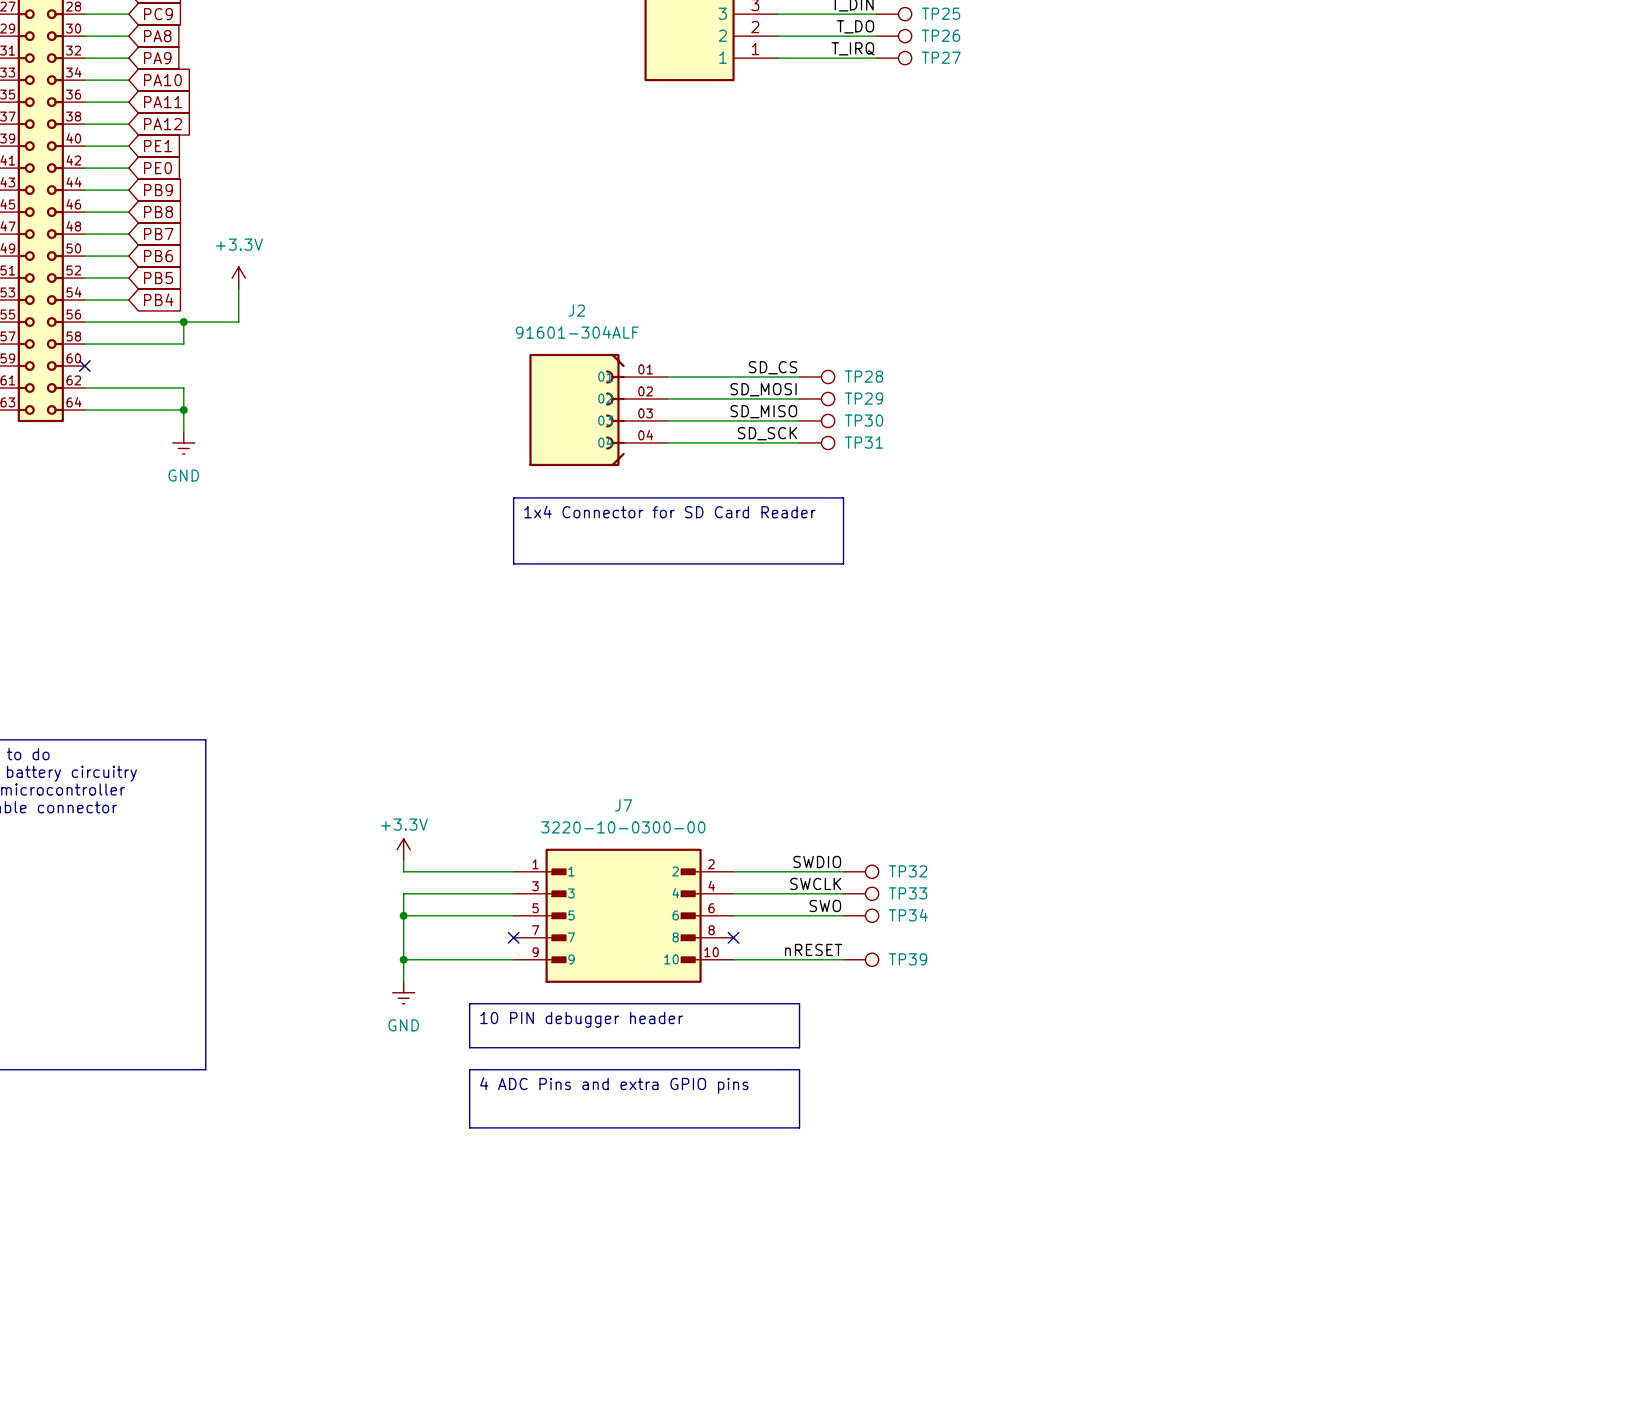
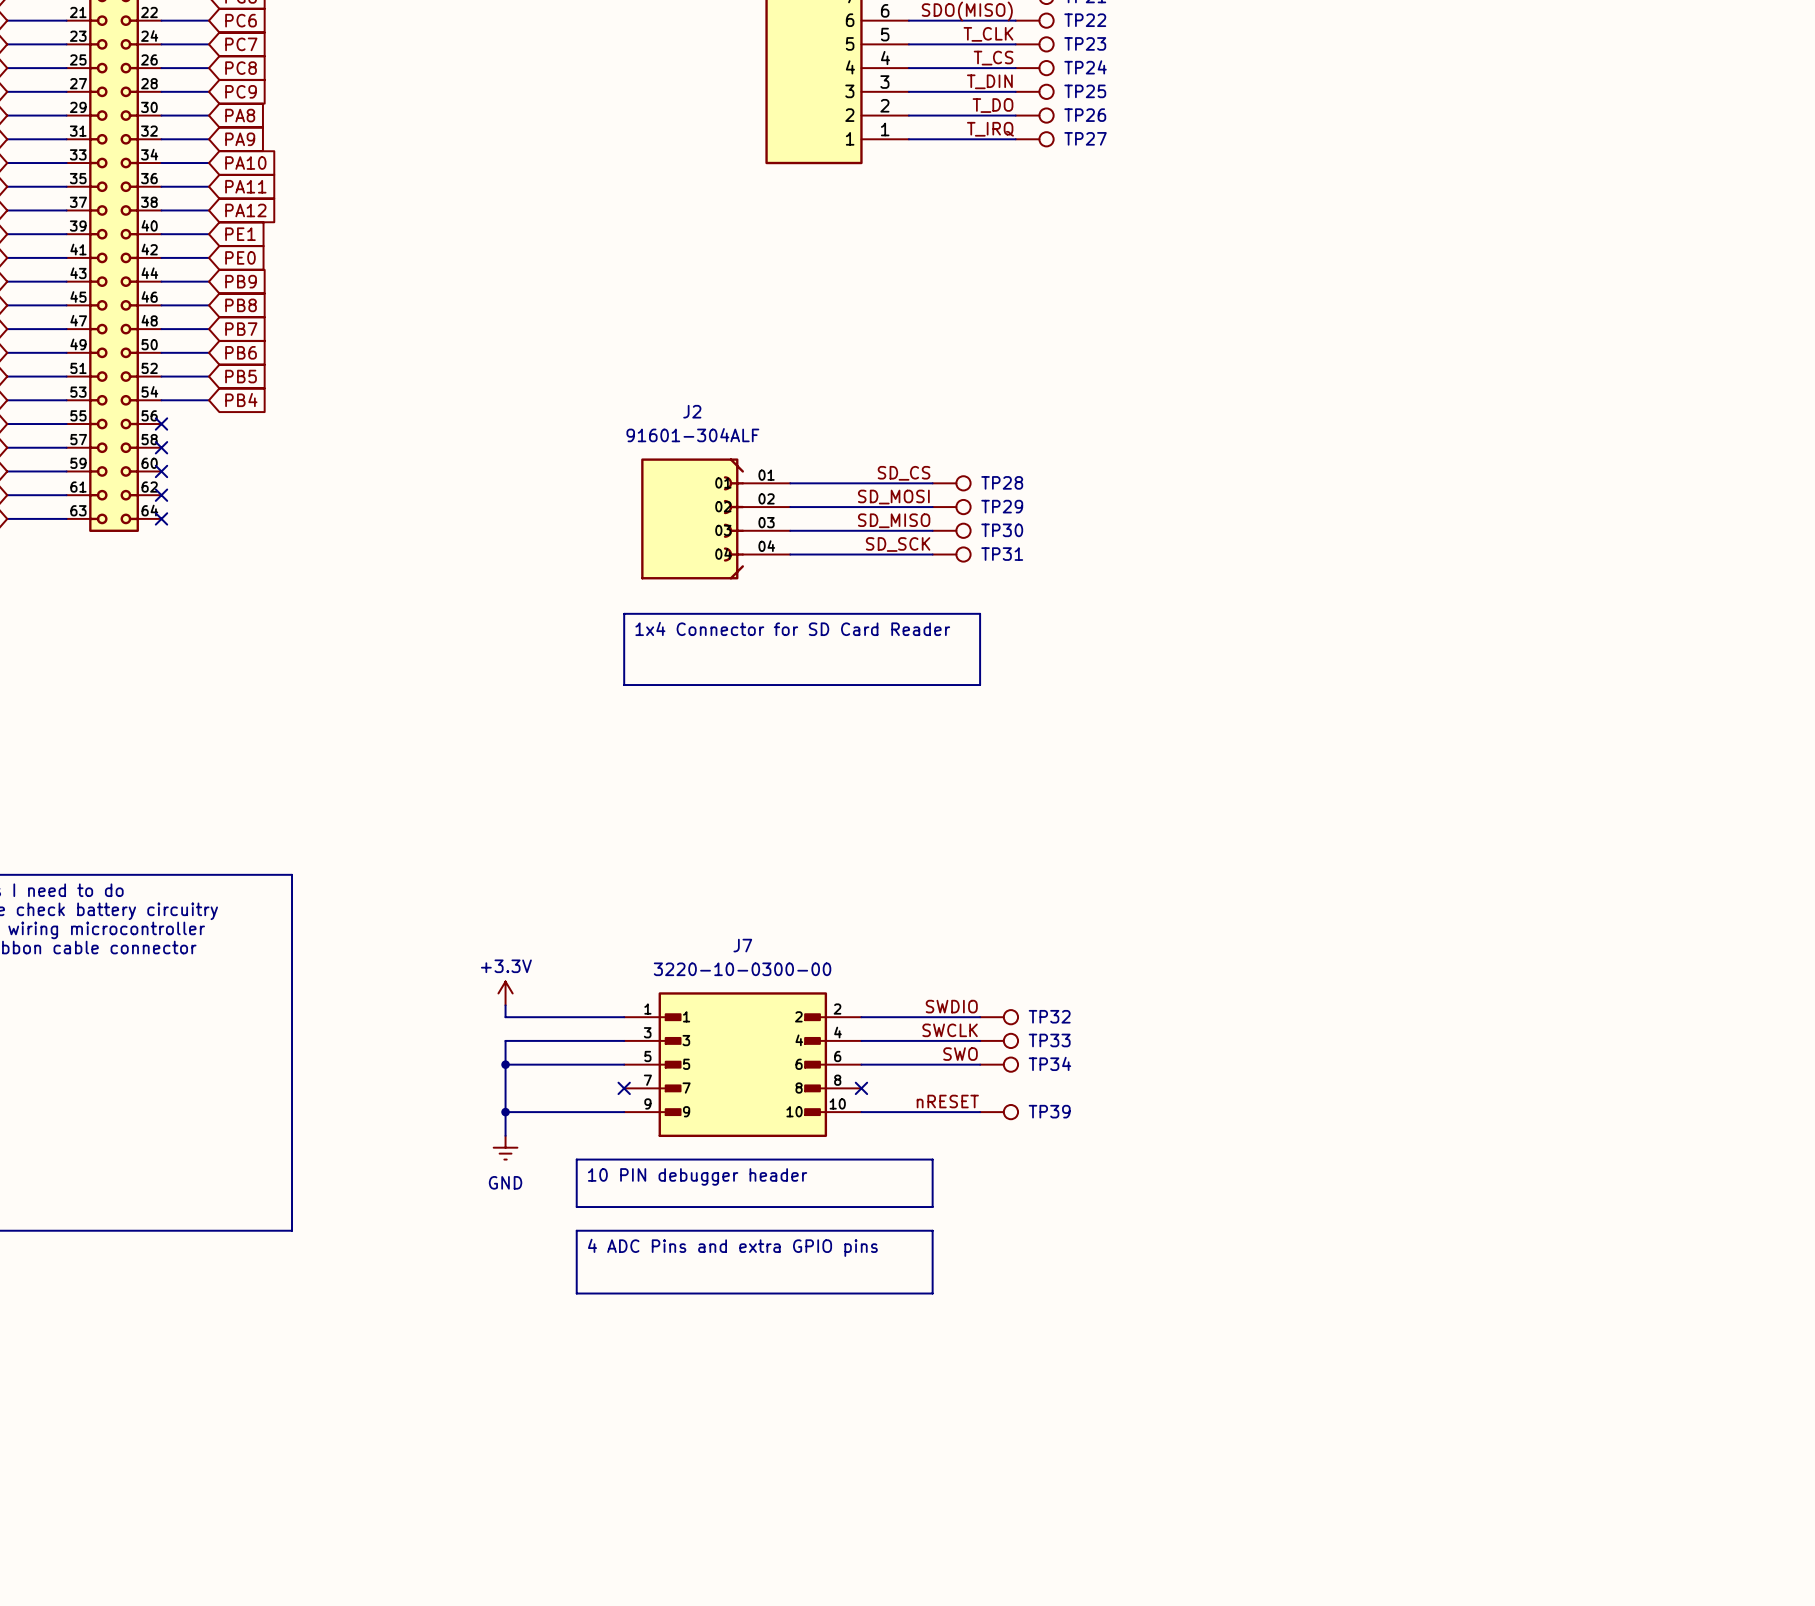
power symbol: +3.3V (238, 278) -> none
wire: (238, 289) (238, 322) (84, 322) -> none
no-connect mark: none -> (161, 424)
wire: (183, 322) (183, 344) (84, 344) -> none
junction: (183, 322) -> none
no-connect mark: none -> (161, 447)
wire: (84, 388) (183, 388) (183, 431) -> none
no-connect mark: none -> (161, 495)
wire: (84, 409) (183, 409) -> none
no-connect mark: none -> (161, 518)
junction: (183, 409) -> none
power symbol: GND (183, 442) -> none

